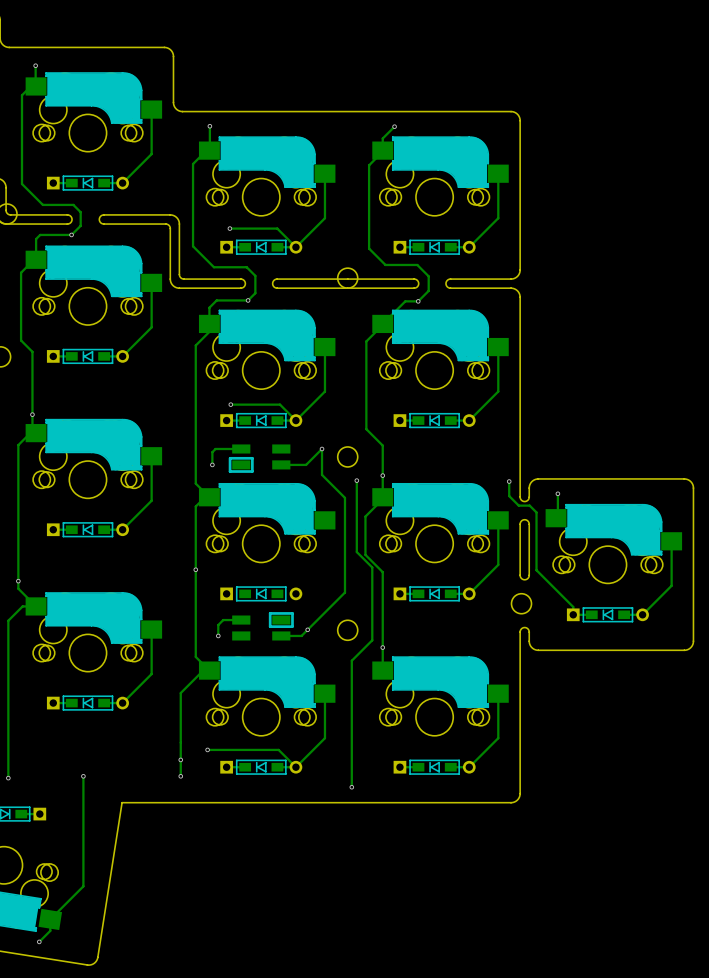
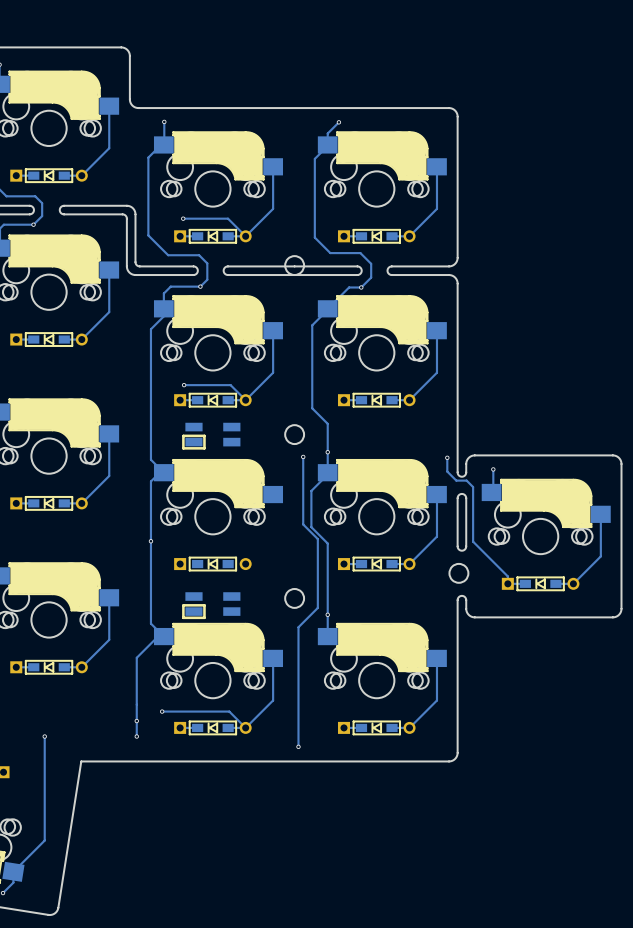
track: (241, 448) (215, 448) (212, 452) (212, 464) -> none
via: (322, 448) -> none
via: (212, 464) -> none
track: (281, 464) (306, 464) (322, 448) (322, 474) (344, 497) (344, 592) (301, 635) (281, 635) -> none
track: (241, 620) (223, 620) (218, 625) (218, 635) -> none
part rotation: 0° (263, 626) -> 180° (211, 605)
via: (307, 629) -> none
via: (218, 635) -> none

